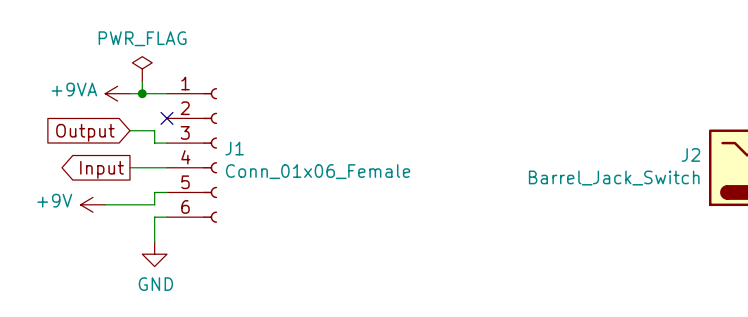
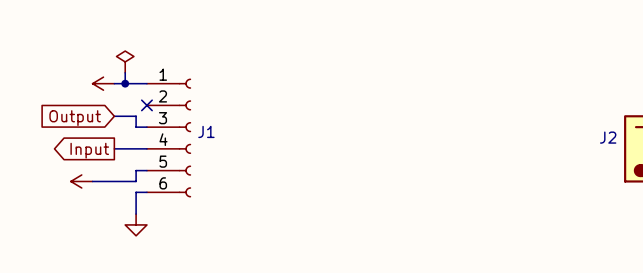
power symbol text: PWR_FLAG (142, 38) -> none
power symbol text: +9VA (74, 89) -> none
J1 value: Conn_01x06_Female (318, 171) -> none
J2 value: Barrel_Jack_Switch (614, 178) -> none
power symbol text: +9V (54, 200) -> none
power symbol text: GND (155, 284) -> none

